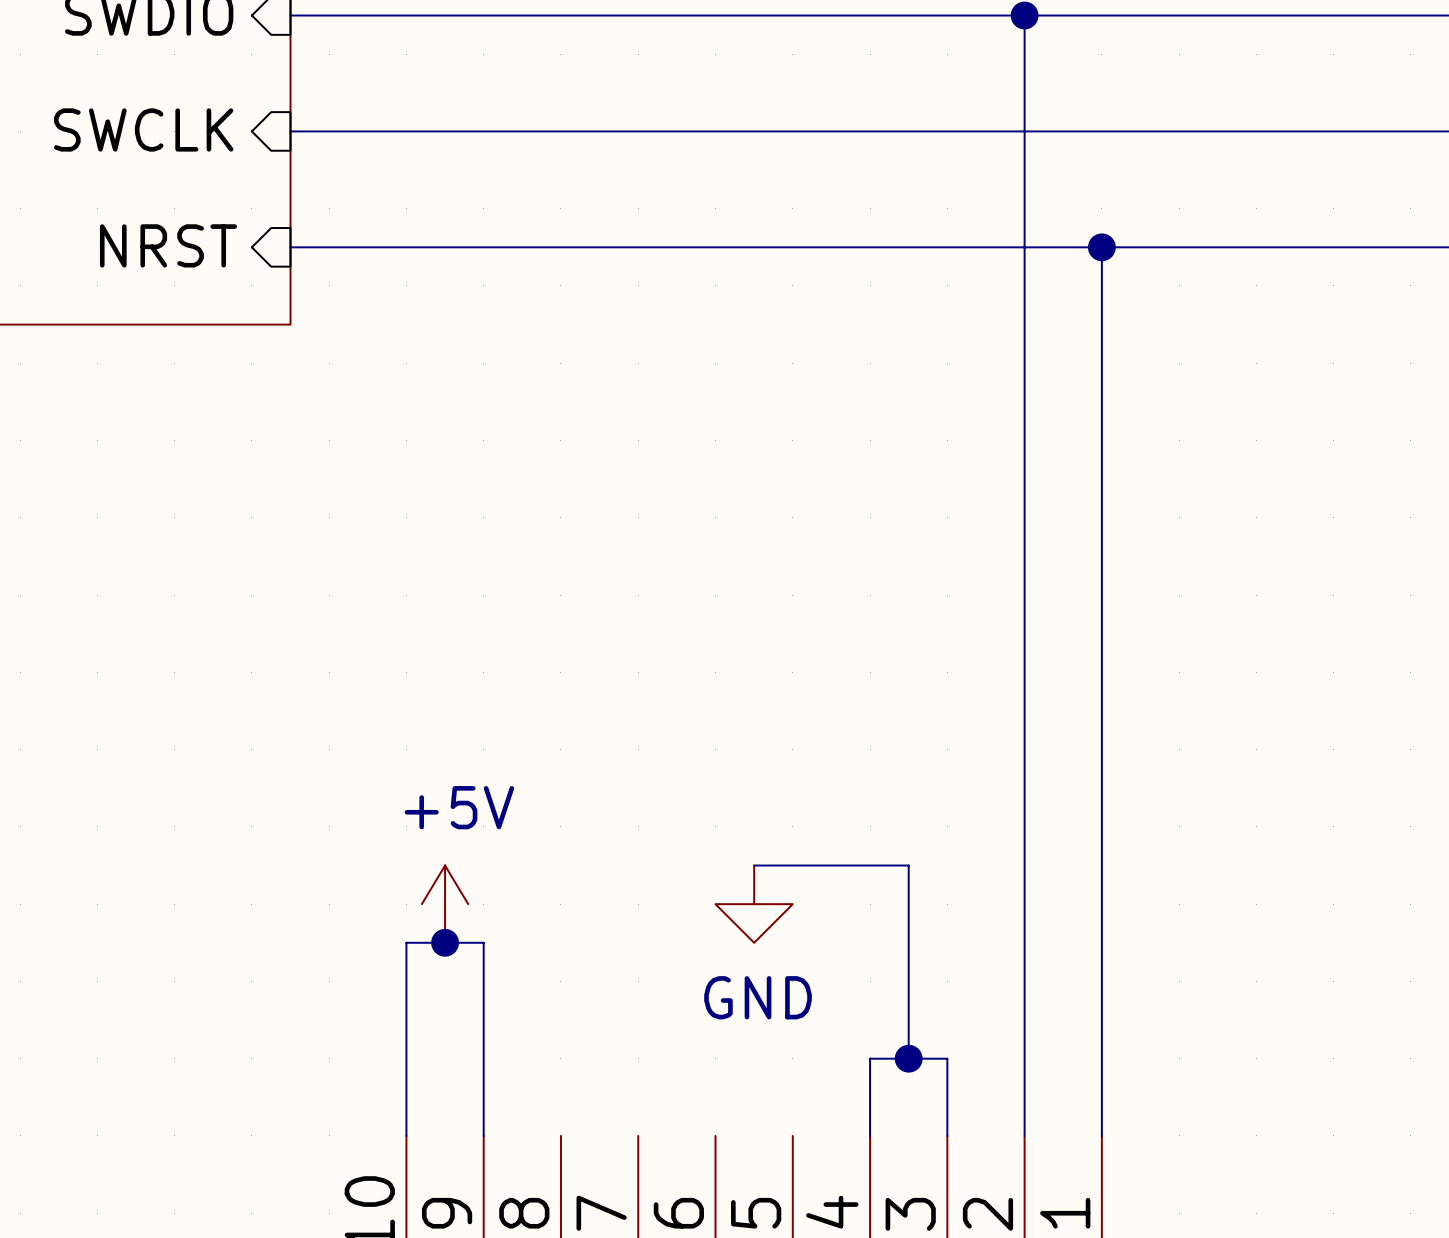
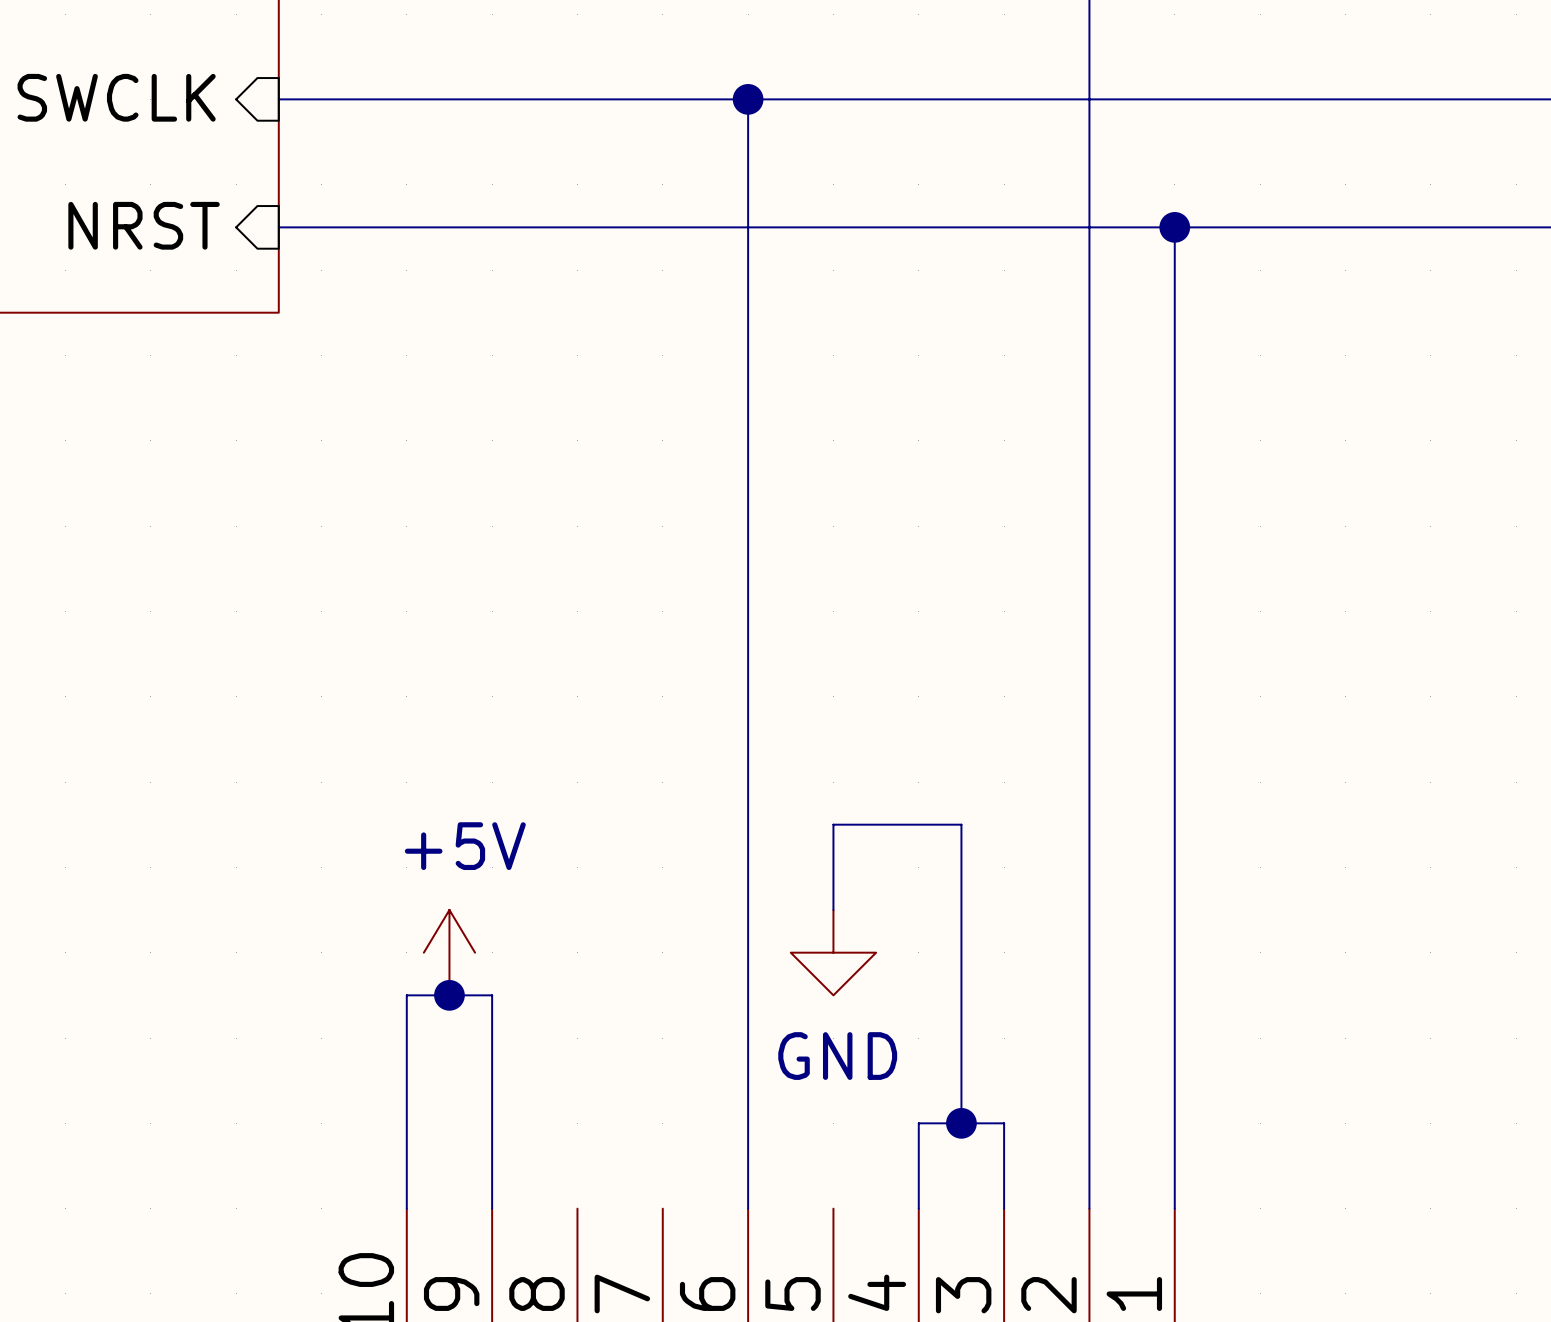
wire: none -> (748, 99) (748, 1208)
junction: none -> (748, 99)
wire: (754, 865) (908, 865) -> (833, 910) (833, 824) (961, 824) (961, 910)
power symbol position: GND (754, 904) -> GND (833, 952)

